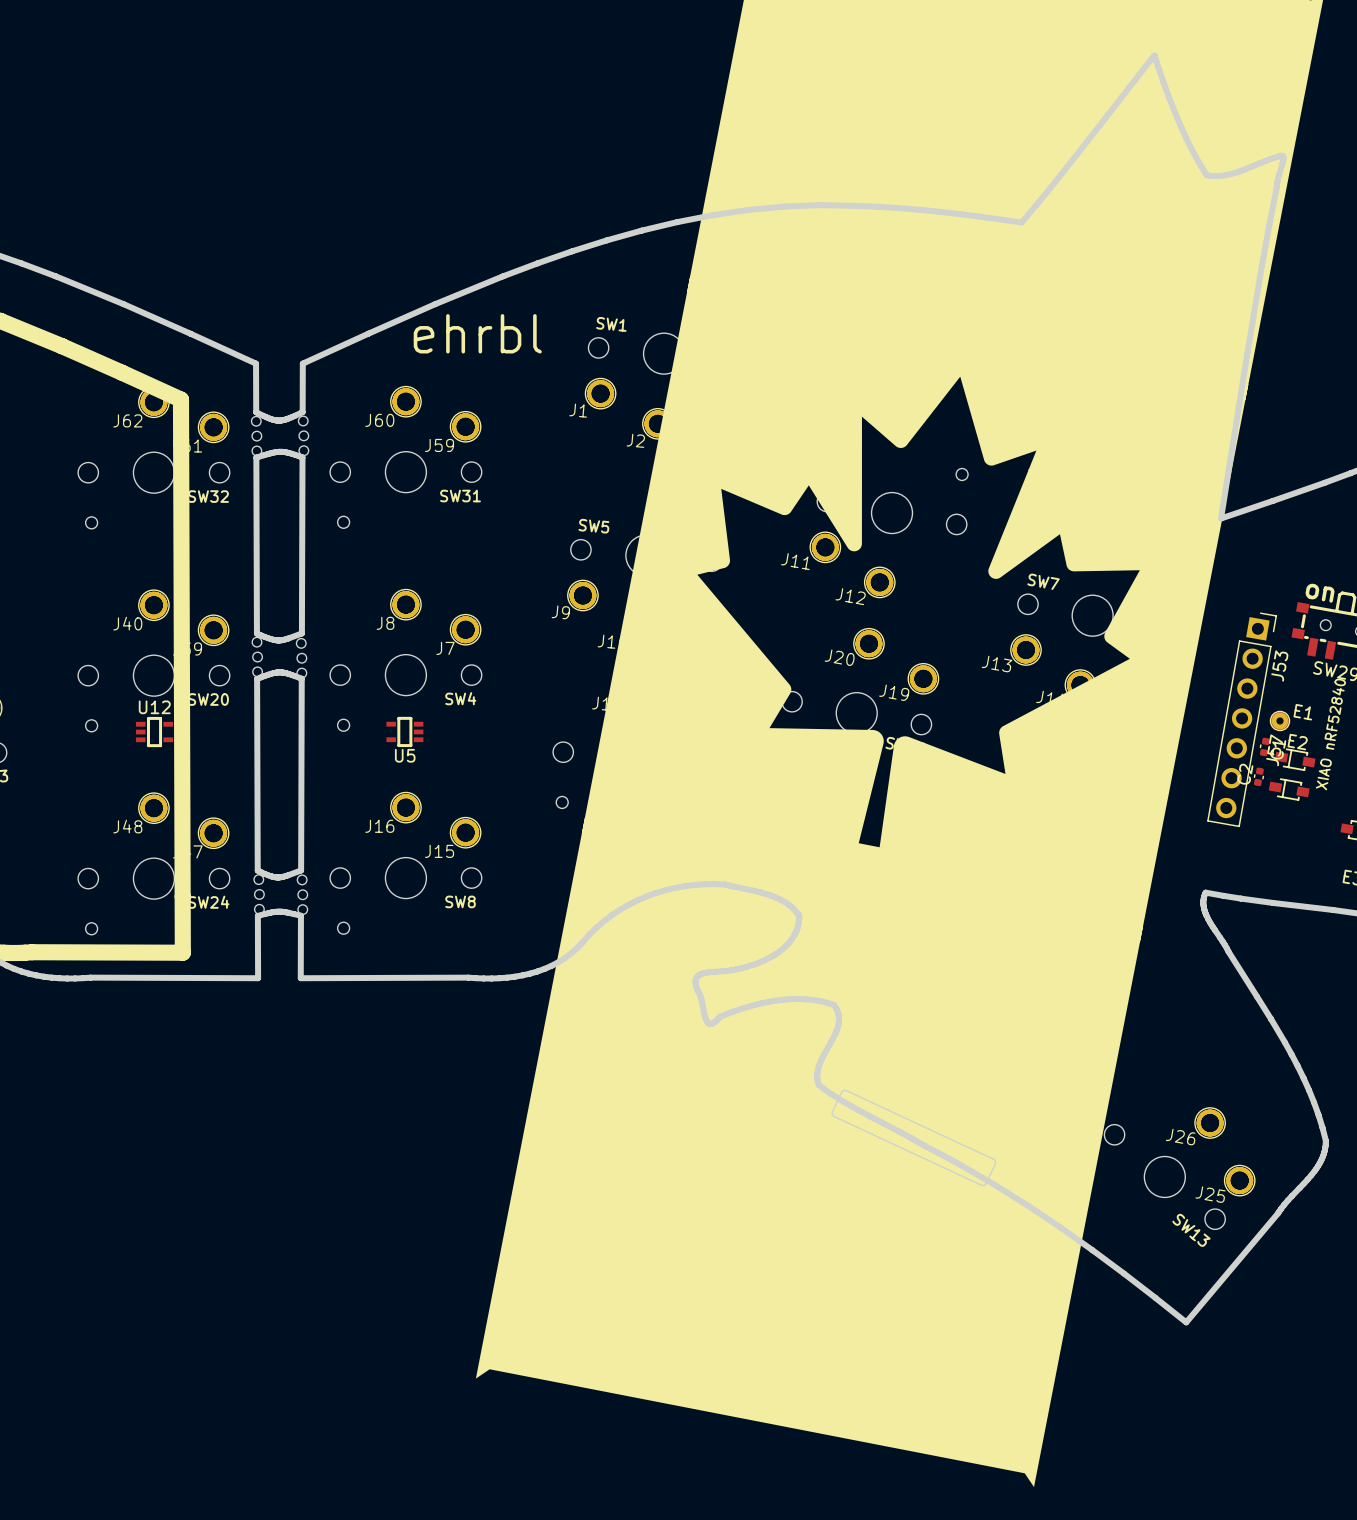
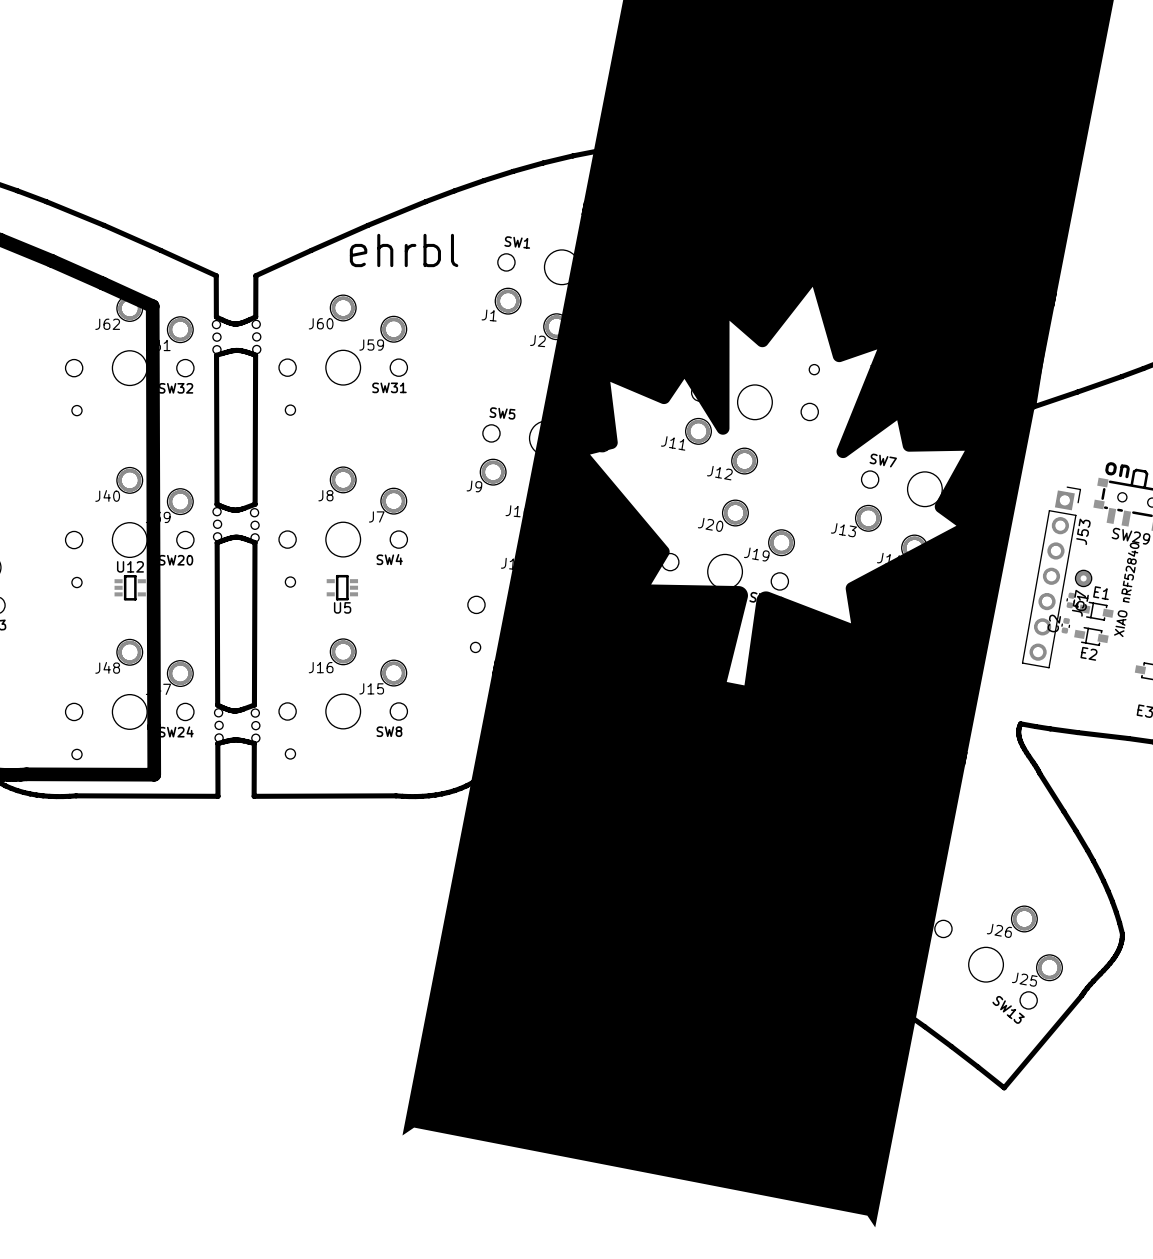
E1 name position: E1 (1302, 712) -> E1 (1100, 593)
E2 name position: E2 (1297, 742) -> E2 (1089, 653)

